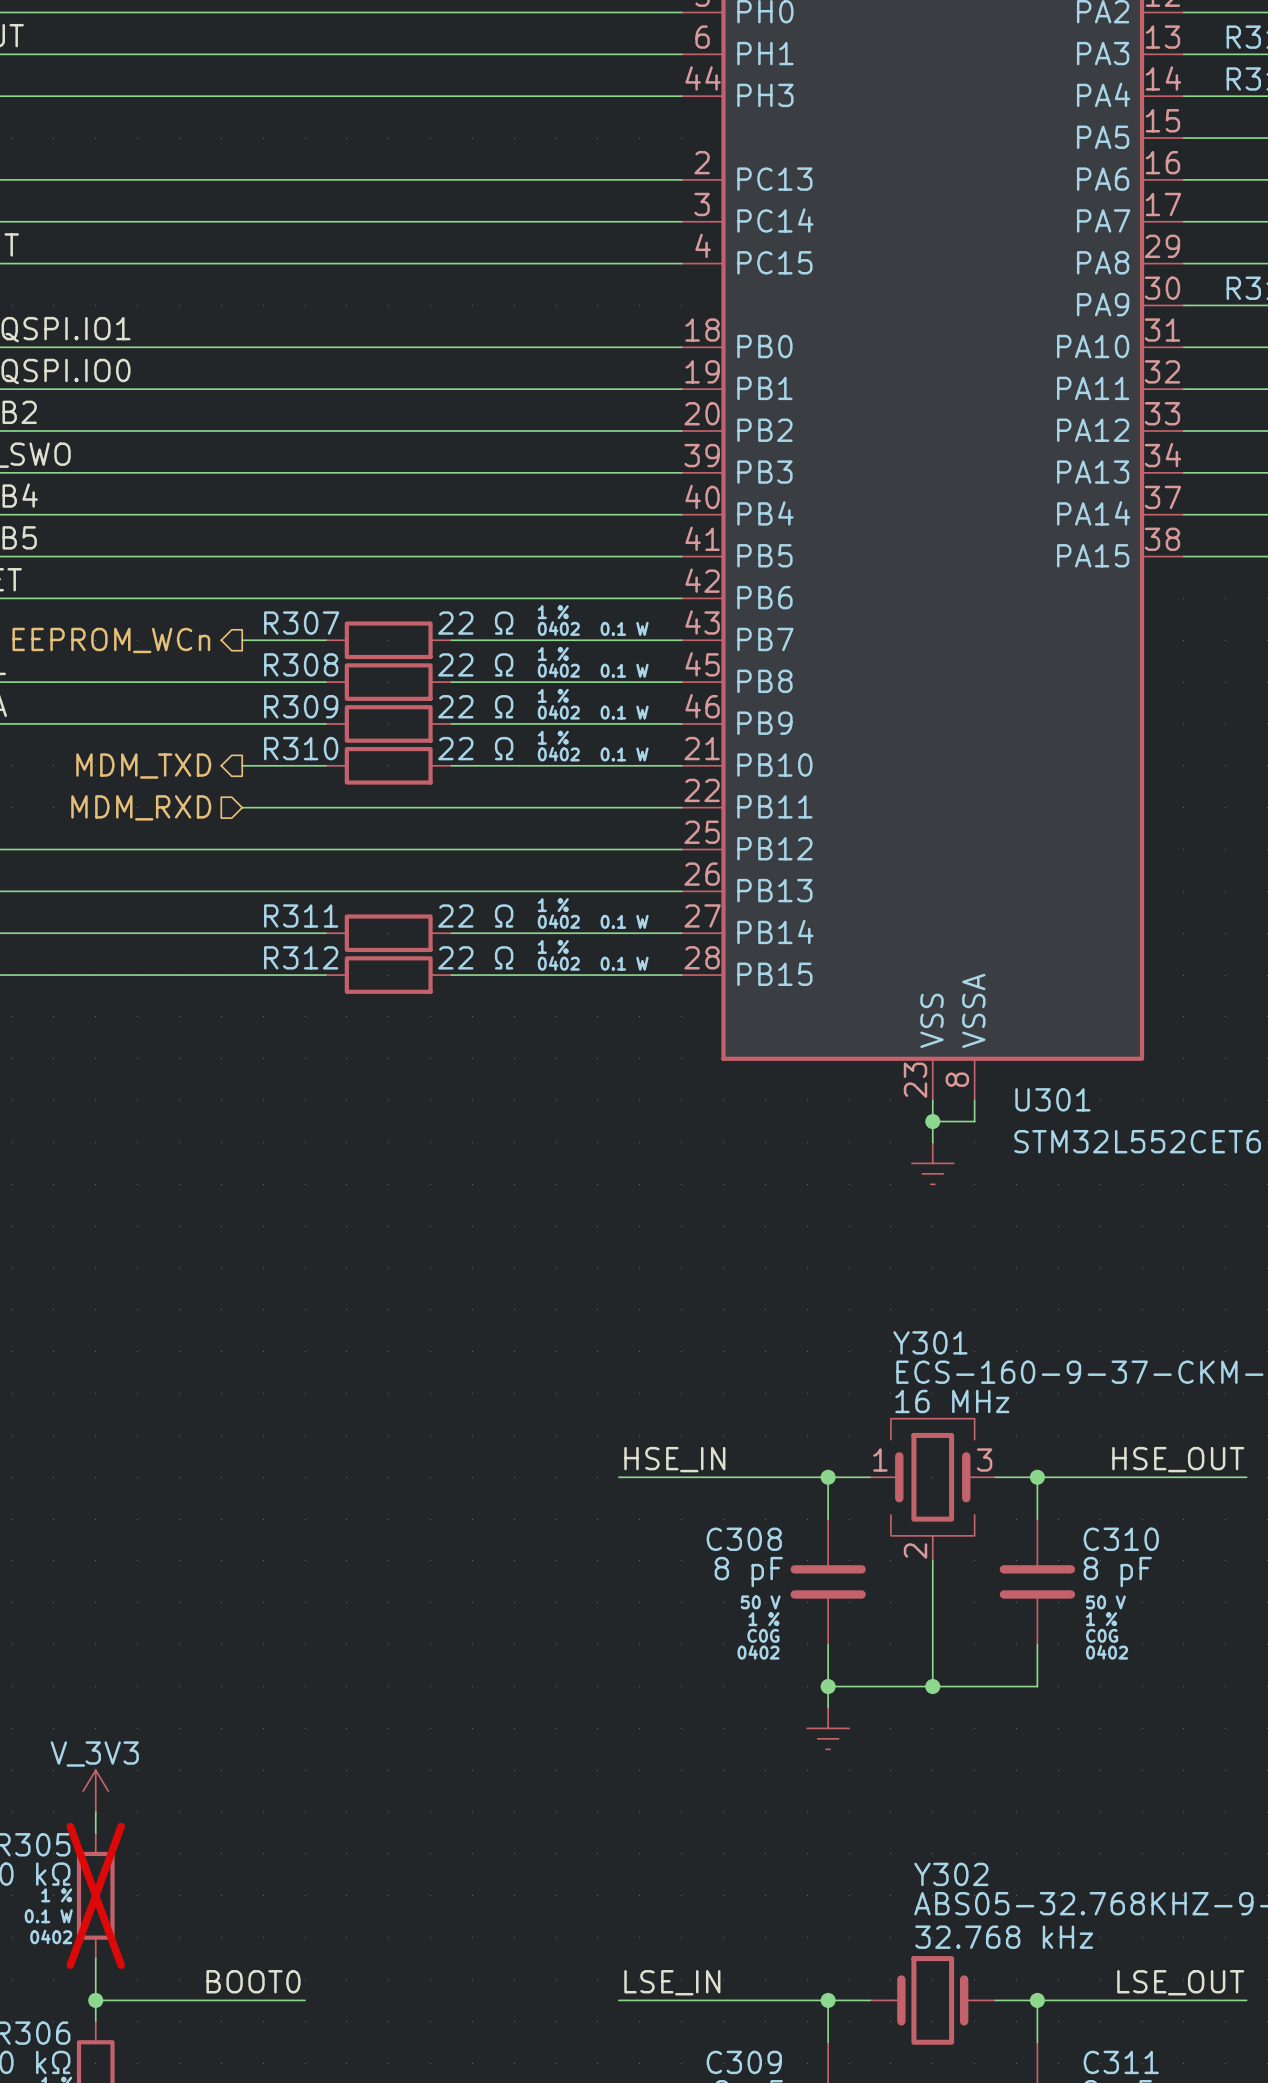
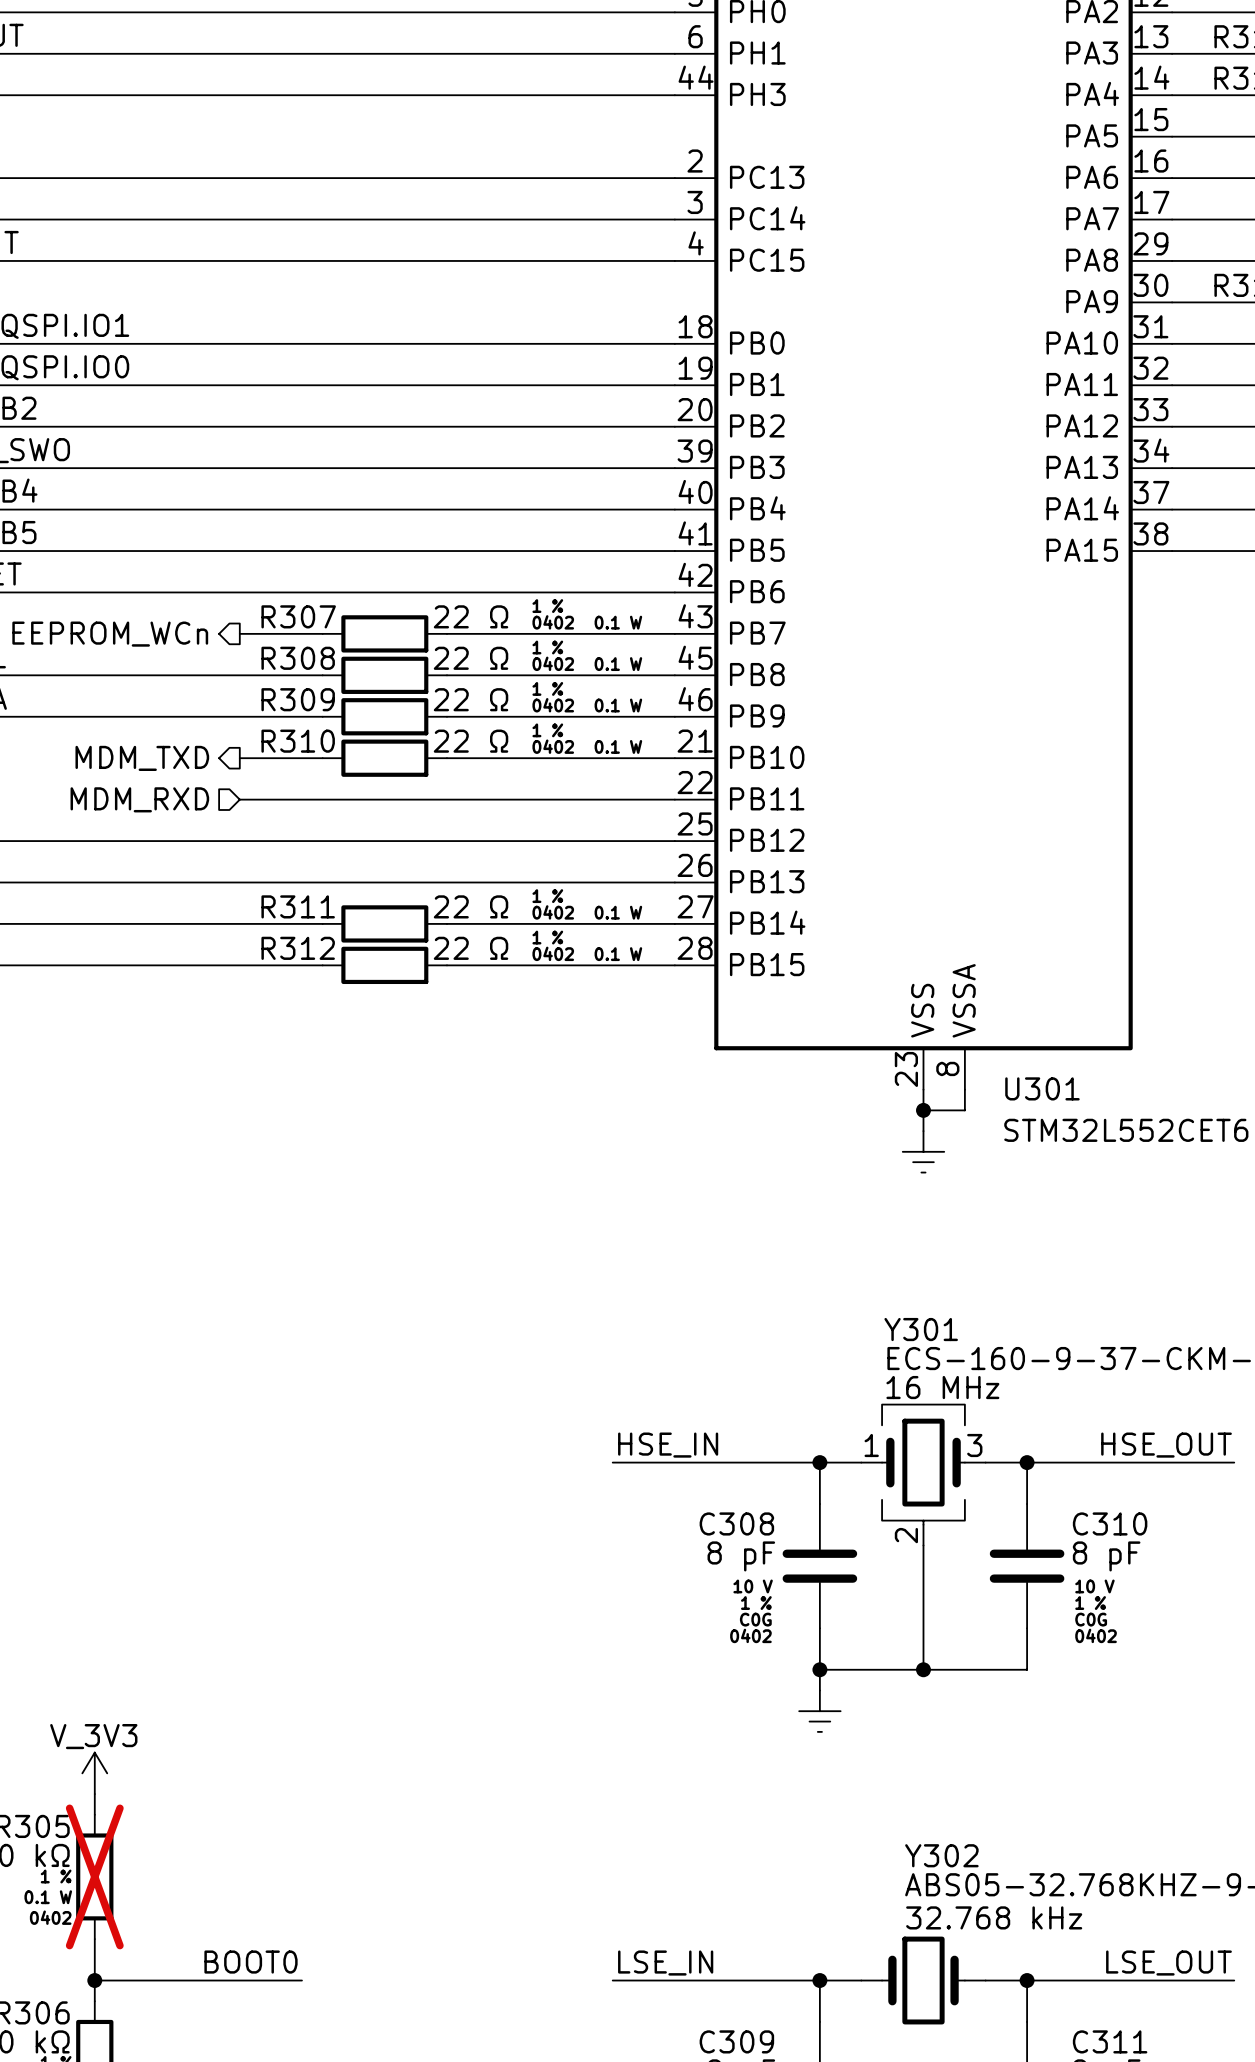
C308 text: 50 V (760, 1602) -> 10 V (753, 1586)
C310 text: 50 V (1105, 1602) -> 10 V (1094, 1586)

